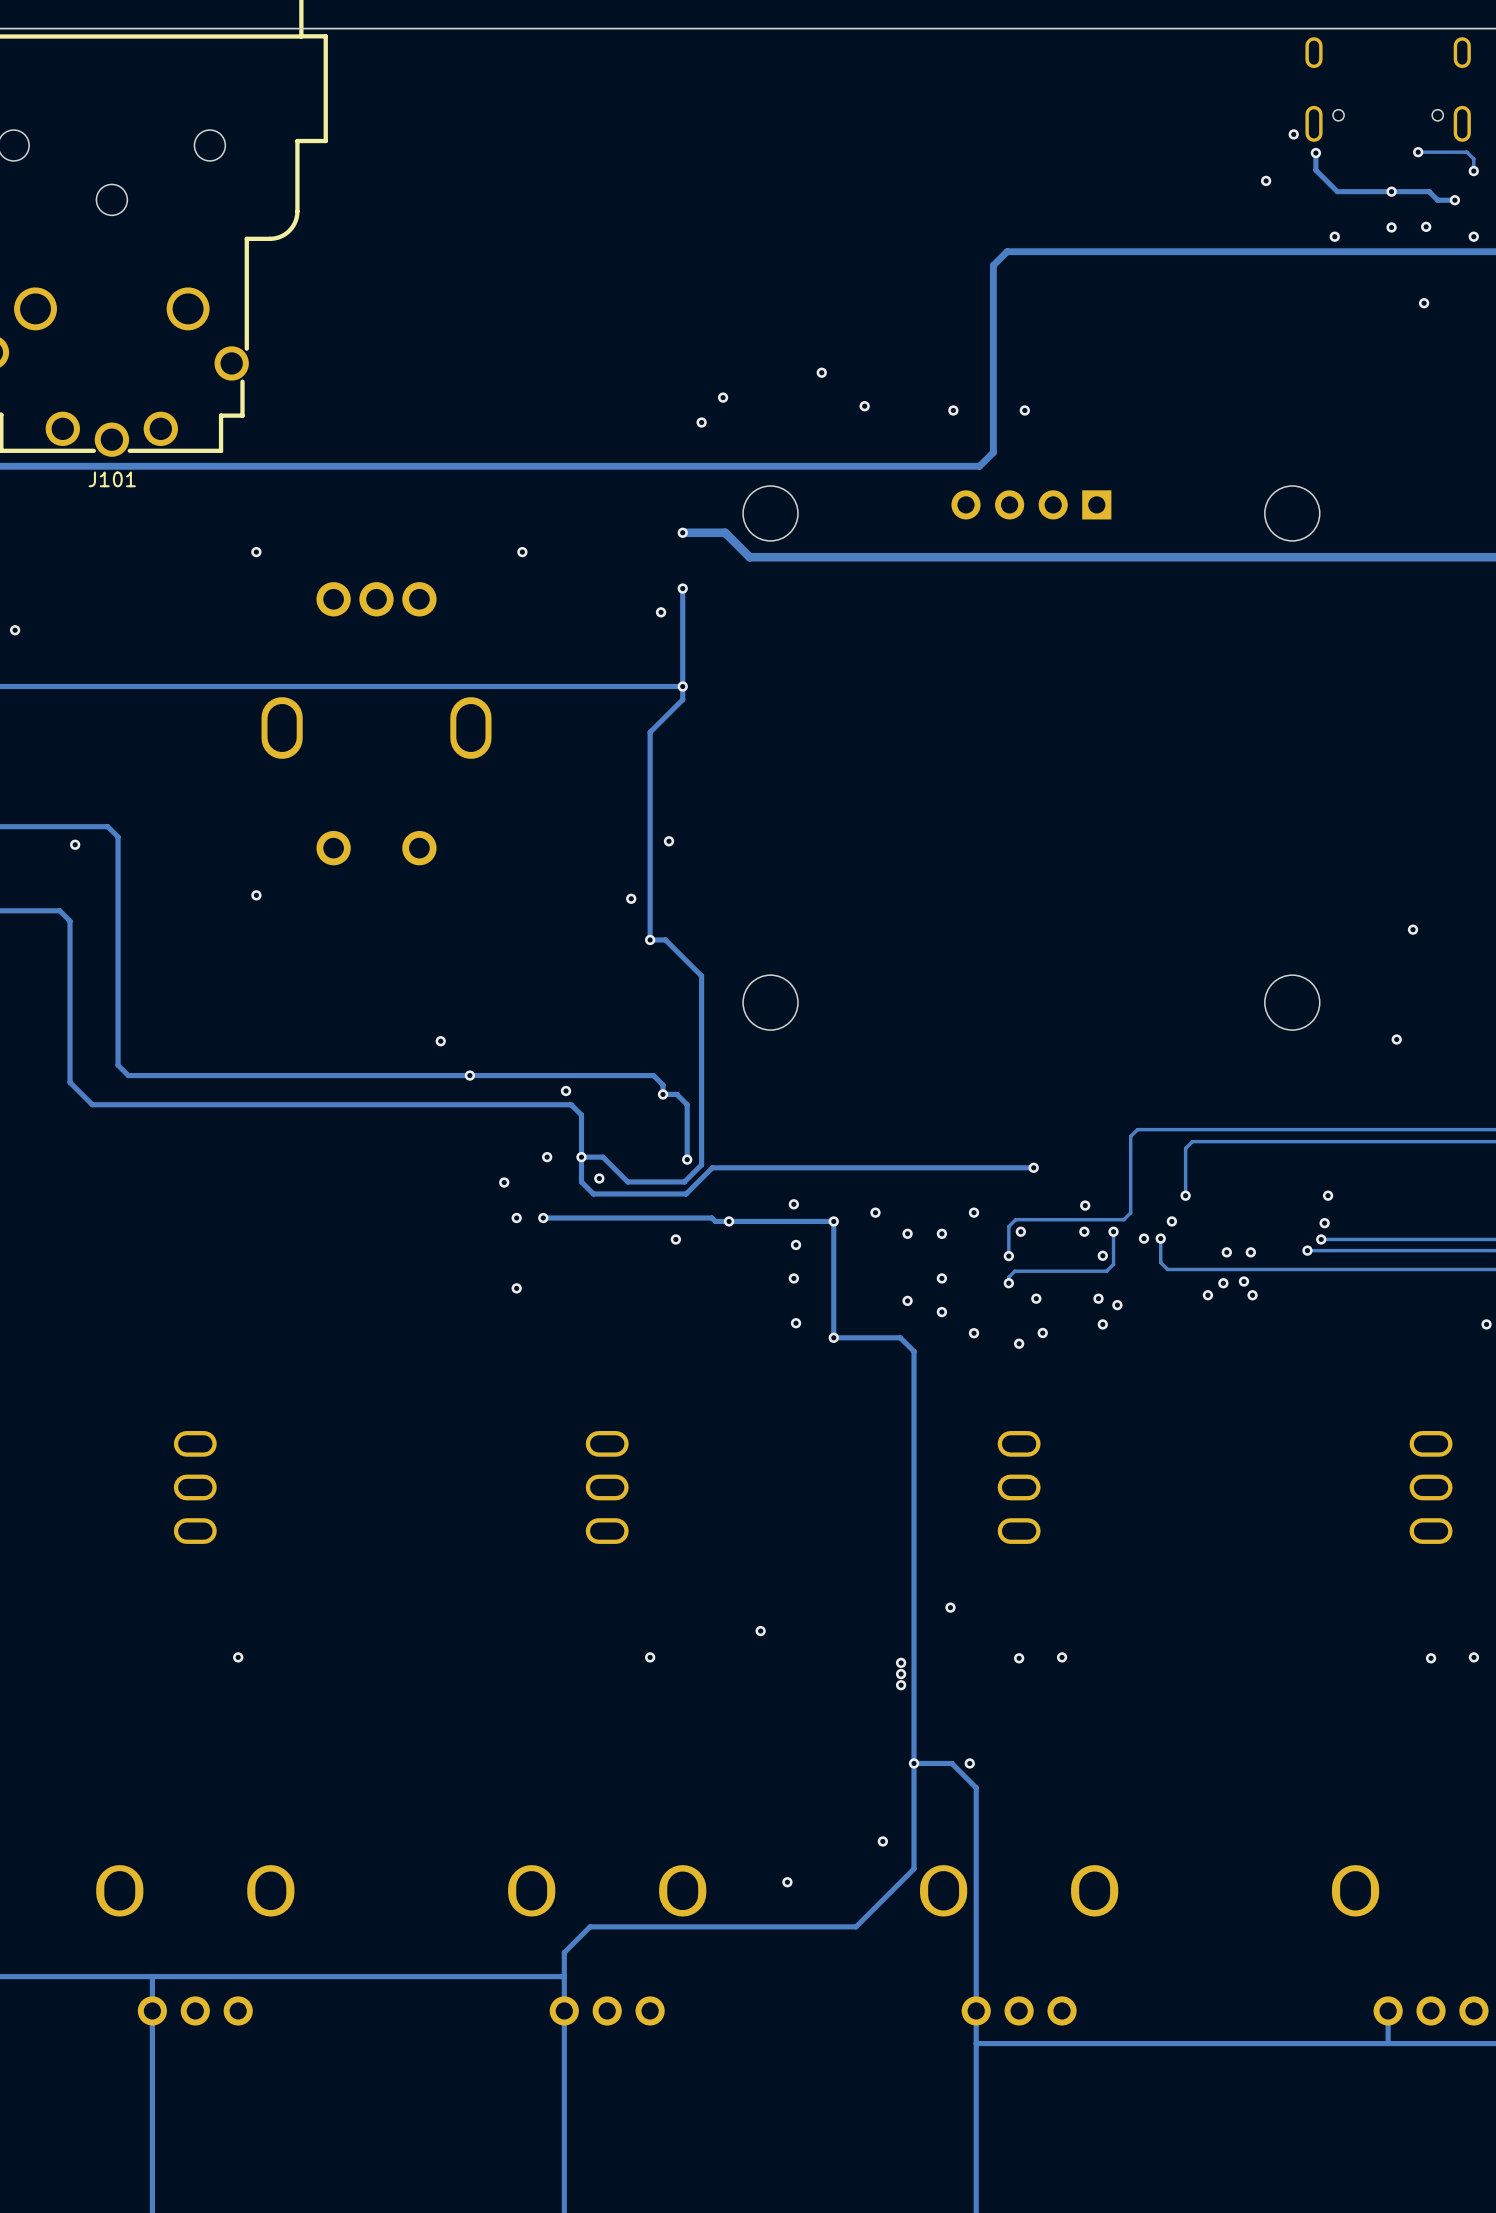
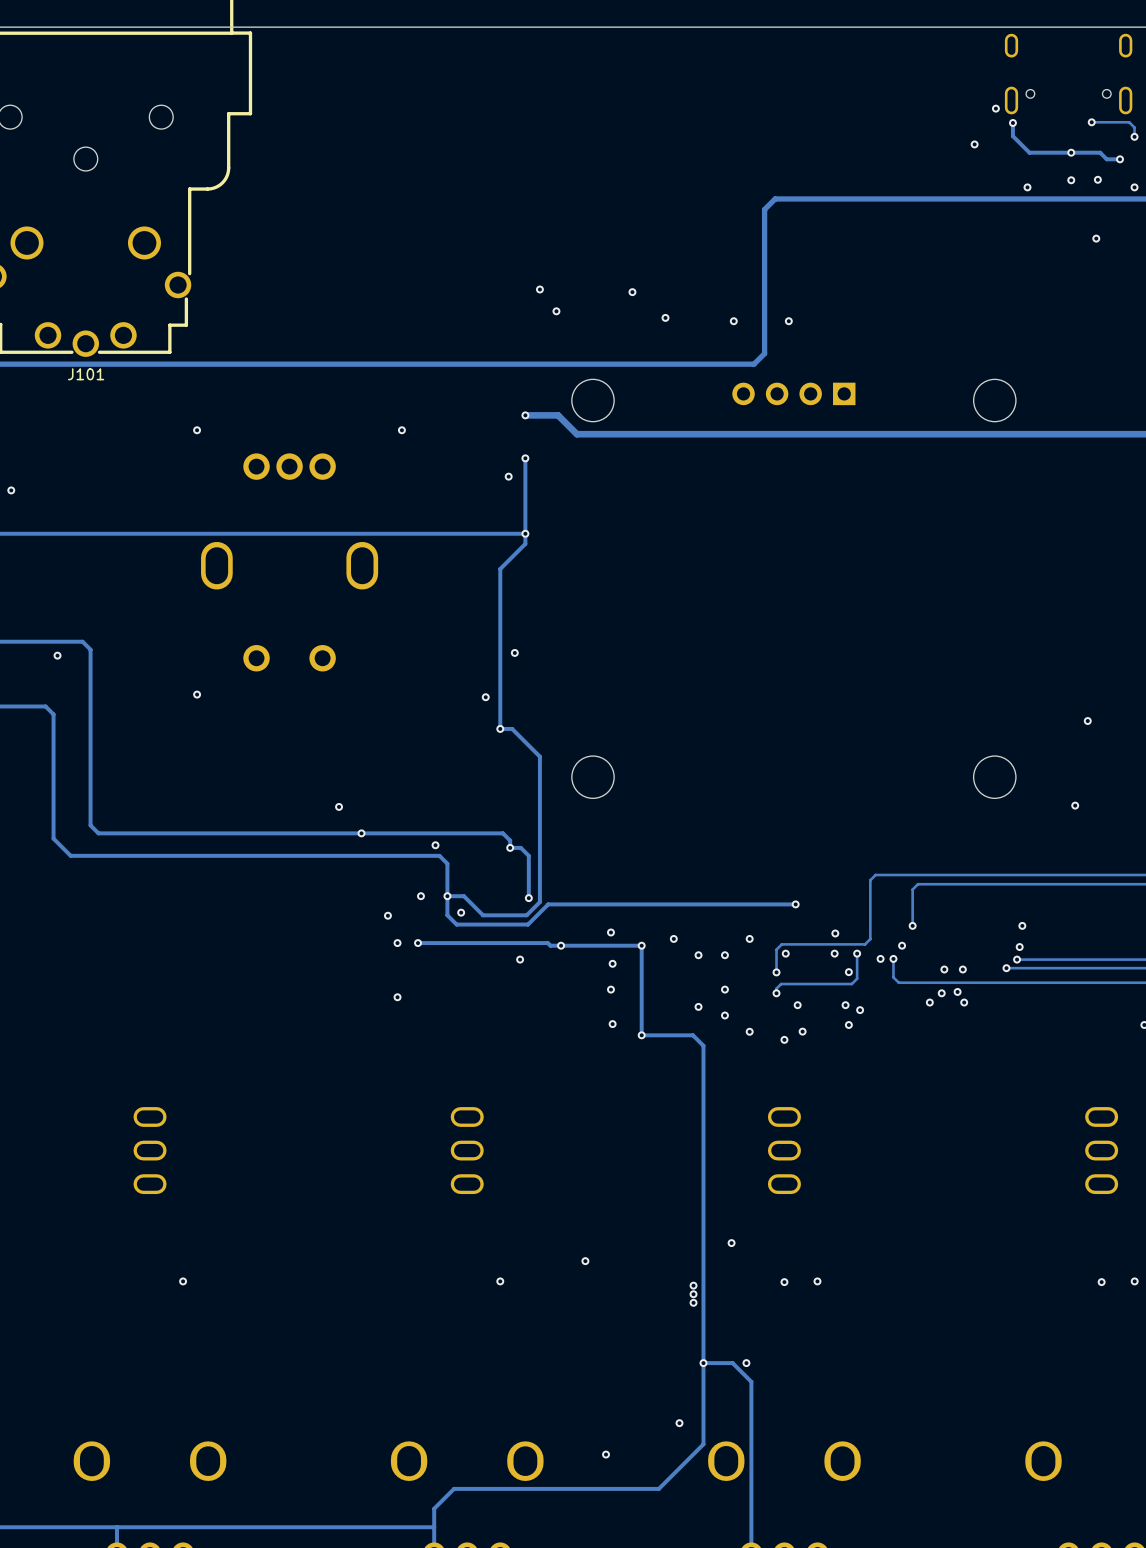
via position: (701, 422) -> (539, 289)

